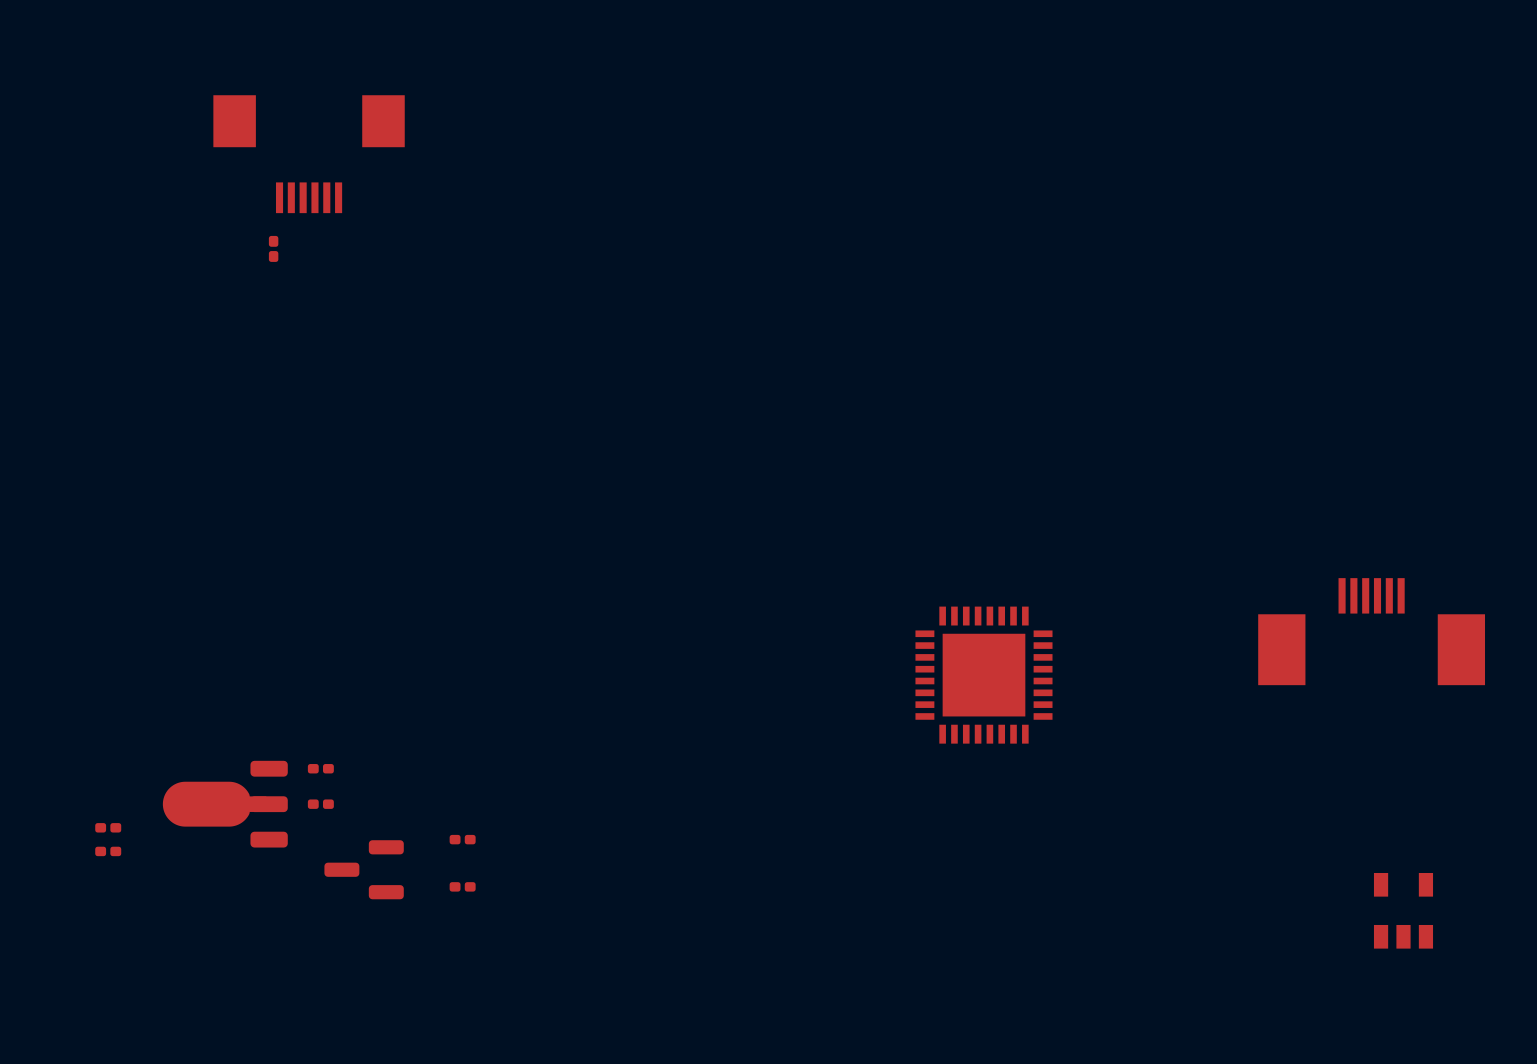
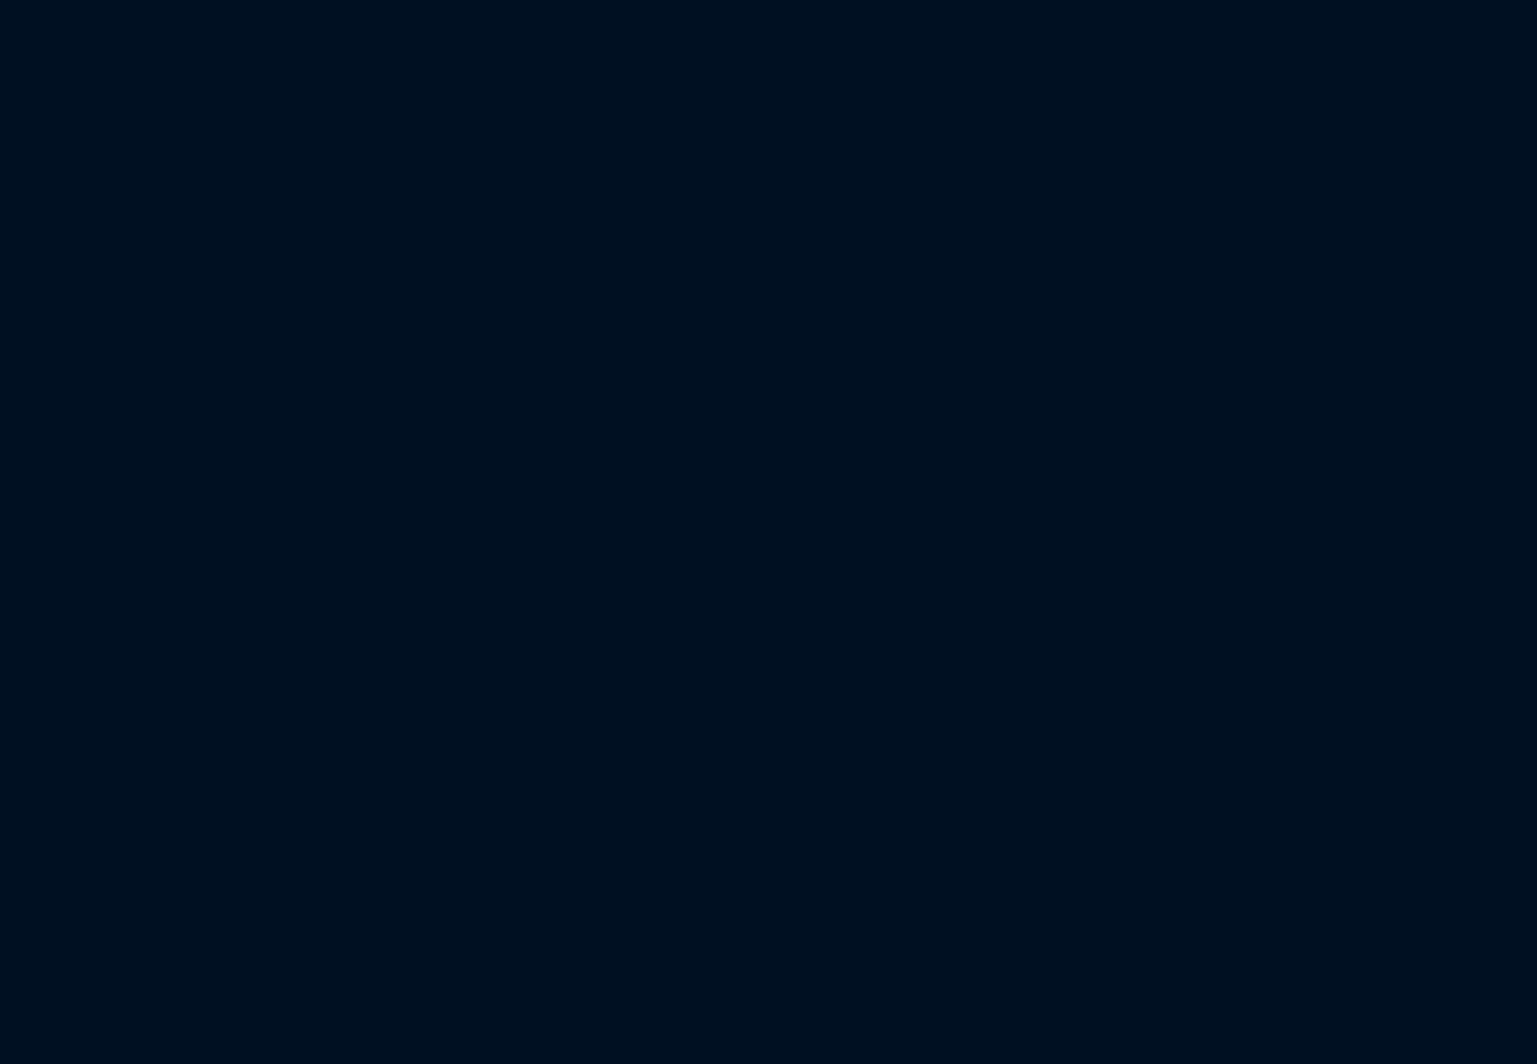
part: (309, 154) -> none
part: (273, 248) -> none
part: (1371, 631) -> none
part: (983, 675) -> none
part: (320, 768) -> none
part: (225, 804) -> none
part: (320, 804) -> none
part: (108, 827) -> none
part: (462, 839) -> none
part: (108, 851) -> none
part: (364, 869) -> none
part: (462, 886) -> none
part: (1403, 910) -> none

